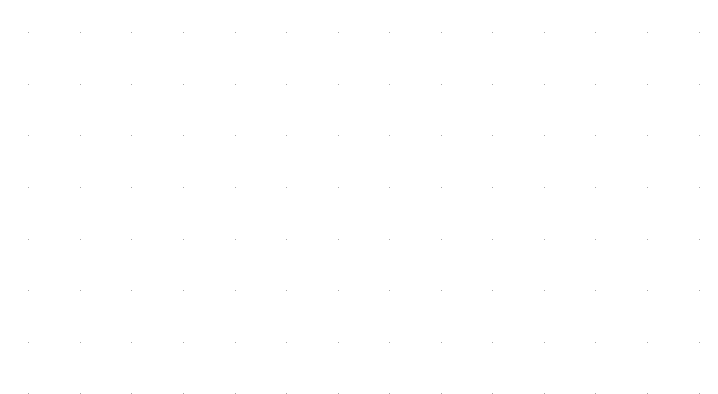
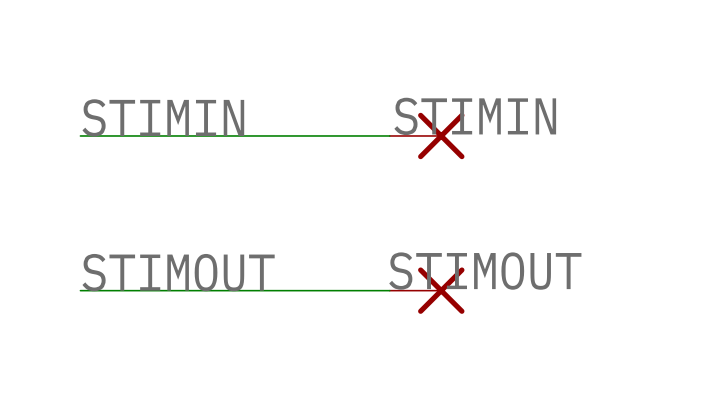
label: none -> STIMIN (163, 117)
wire: none -> (80, 135) (389, 135)
STIMIN: none -> (427, 135)
label: none -> STIMOUT (178, 272)
wire: none -> (80, 290) (389, 290)
STIMOUT: none -> (427, 290)

